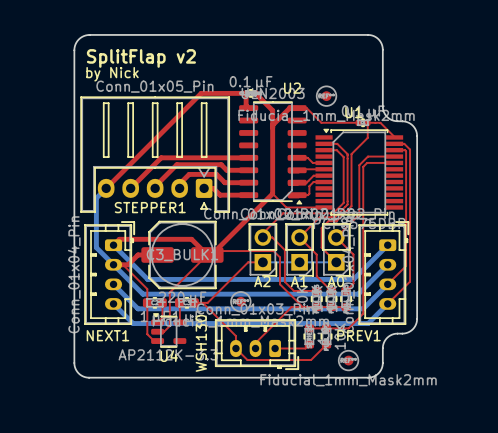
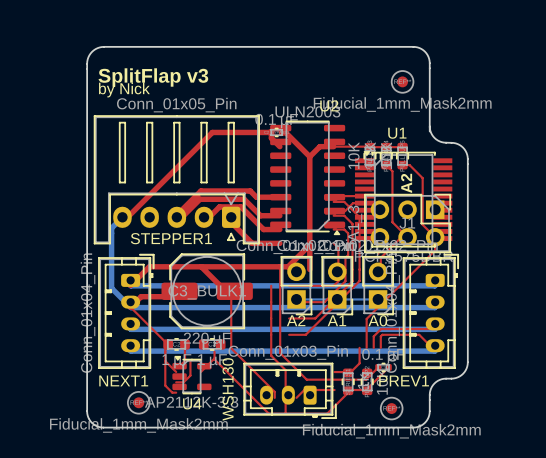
text: SplitFlap v2 (141, 58) -> SplitFlap v3 (153, 77)
part position: (250, 93) -> (276, 132)
top track: (255, 93) (272, 110) (272, 193) -> none
part position: (326, 96) -> (402, 81)
top track: (248, 108) (246, 105) (246, 93) (201, 93) (106, 188) -> none
top track: none -> (281, 132) (285, 132) (309, 156)
top track: (358, 122) (321, 122) (306, 108) (289, 108) (272, 125) -> none
part position: (363, 122) -> (383, 367)
top track: none -> (279, 146) (271, 138) (271, 132) (212, 132) (122, 222)
top track: none -> (402, 147) (319, 146) (309, 156)
top track: none -> (309, 156) (309, 269)
top track: (400, 137) (394, 137) (380, 122) (367, 122) (367, 137) (351, 154) (351, 206) (336, 221) (328, 221) (321, 228) (321, 247) (336, 262) -> none
top track: none -> (386, 165) (392, 171) (392, 222) (407, 237) (401, 237) (380, 257) (380, 269)
top track: none -> (402, 165) (409, 165) (422, 178) (422, 224) (435, 237) (435, 250) (366, 318) (366, 347)
top track: (324, 143) (337, 143) (347, 154) (347, 204) (334, 217) (319, 217) (302, 234) -> none
top track: (394, 143) (404, 143) (410, 149) (410, 281) (387, 303) -> none
top track: (324, 150) (336, 150) (343, 157) (343, 202) (333, 213) (283, 213) (262, 233) -> none
top track: (394, 150) (406, 151) (406, 265) (387, 284) -> none
top track: (394, 156) (367, 156) (359, 165) (359, 214) (338, 235) -> none
top track: (248, 157) (161, 157) (130, 188) -> none
top track: (297, 157) (307, 157) (312, 162) (324, 162) -> none
text: none -> A2 (406, 183)
top track: (394, 162) (367, 162) (363, 166) (363, 313) (348, 328) (309, 328) -> none
top track: none -> (333, 201) (344, 201) (359, 217) (359, 280) (305, 334) (289, 334)
top track: (248, 182) (224, 182) (216, 174) (189, 174) (179, 183) (179, 188) -> none
top track: (324, 182) (313, 182) (309, 186) (308, 195) (297, 195) -> none
top track: none -> (279, 215) (260, 215) (244, 199) (199, 199) (176, 222)
top track: none -> (333, 215) (344, 215) (352, 223) (352, 281) (315, 318) (289, 318)
top track: (204, 188) (213, 188) (220, 195) (248, 195) -> none
top track: none -> (204, 222) (219, 206) (241, 206) (263, 229) (279, 229)
top track: none -> (231, 222) (252, 243) (279, 243)
top track: (272, 193) (211, 254) (207, 254) -> none
top track: (272, 193) (286, 207) (324, 207) -> none
J1: none -> A1_3 (407, 223)
top track: none -> (333, 229) (344, 229) (348, 233) (345, 281) (324, 302) (289, 302)
top track: none -> (333, 243) (338, 248) (338, 281) (333, 285) (289, 285)
top track: none -> (309, 245) (288, 266) (149, 266) (130, 285)
top track: none -> (201, 266) (231, 296) (231, 348) (274, 391) (274, 397)
top track: none -> (280, 266) (280, 353) (306, 379) (366, 379) (378, 367)
top track: (262, 237) (272, 237) (284, 250) (284, 281) (293, 290) (316, 290) -> none
top track: (299, 237) (316, 254) (316, 276) (331, 290) -> none
top track: (336, 237) (353, 254) (353, 283) (346, 290) -> none
bottom track: (386, 244) (353, 279) (147, 279) (113, 245) -> none
top track: (113, 245) (119, 239) (191, 239) (207, 254) -> none
bottom track: (96, 247) (142, 294) (358, 294) (387, 264) -> (111, 283) (111, 288) (130, 307) (435, 307)
bottom track: none -> (434, 284) (130, 285)
top track: none -> (271, 285) (271, 355) (285, 370) (285, 413)
top track: (157, 254) (138, 254) (128, 264) (113, 264) (123, 264) (147, 289) (147, 334) (154, 341) (157, 341) -> none
top track: none -> (176, 296) (141, 296) (130, 307) (165, 341) (165, 385) (172, 392) (176, 392)
top track: (262, 262) (248, 262) (207, 302) (194, 302) -> none
bottom track: (113, 284) (138, 308) -> (130, 350) (157, 351)
bottom track: (387, 284) (363, 308) -> (435, 350) (408, 351)
bottom track: none -> (130, 329) (435, 329)
top track: none -> (435, 329) (381, 329) (373, 336) (373, 347)
part position: (316, 299) -> (402, 156)
part position: (331, 299) -> (386, 156)
part position: (346, 299) -> (369, 156)
part position: (240, 301) -> (138, 402)
top track: (179, 302) (179, 322) -> none
top track: (202, 302) (235, 336) (235, 348) (247, 360) (311, 360) (326, 344) -> none
bottom track: (113, 303) (133, 323) (368, 323) (387, 303) -> none
top track: none -> (359, 347) (359, 363) (350, 372) (334, 372)
top track: none -> (380, 347) (382, 334) (419, 334) (435, 350)
top track: (302, 307) (280, 284) (280, 257) (273, 251) (211, 251) (169, 292) (169, 325) (164, 331) (157, 331) -> none
top track: (346, 307) (291, 307) (255, 343) (255, 348) -> none
top track: none -> (214, 351) (214, 359) (268, 413) (327, 413) (350, 389) (366, 389) (388, 367)
top track: none -> (214, 358) (200, 371)
top track: none -> (190, 360) (190, 375) (183, 382) (176, 382)
top track: none -> (165, 361) (176, 371)
top track: none -> (334, 389) (304, 389) (296, 397)
top track: (309, 344) (305, 348) (275, 348) -> none

